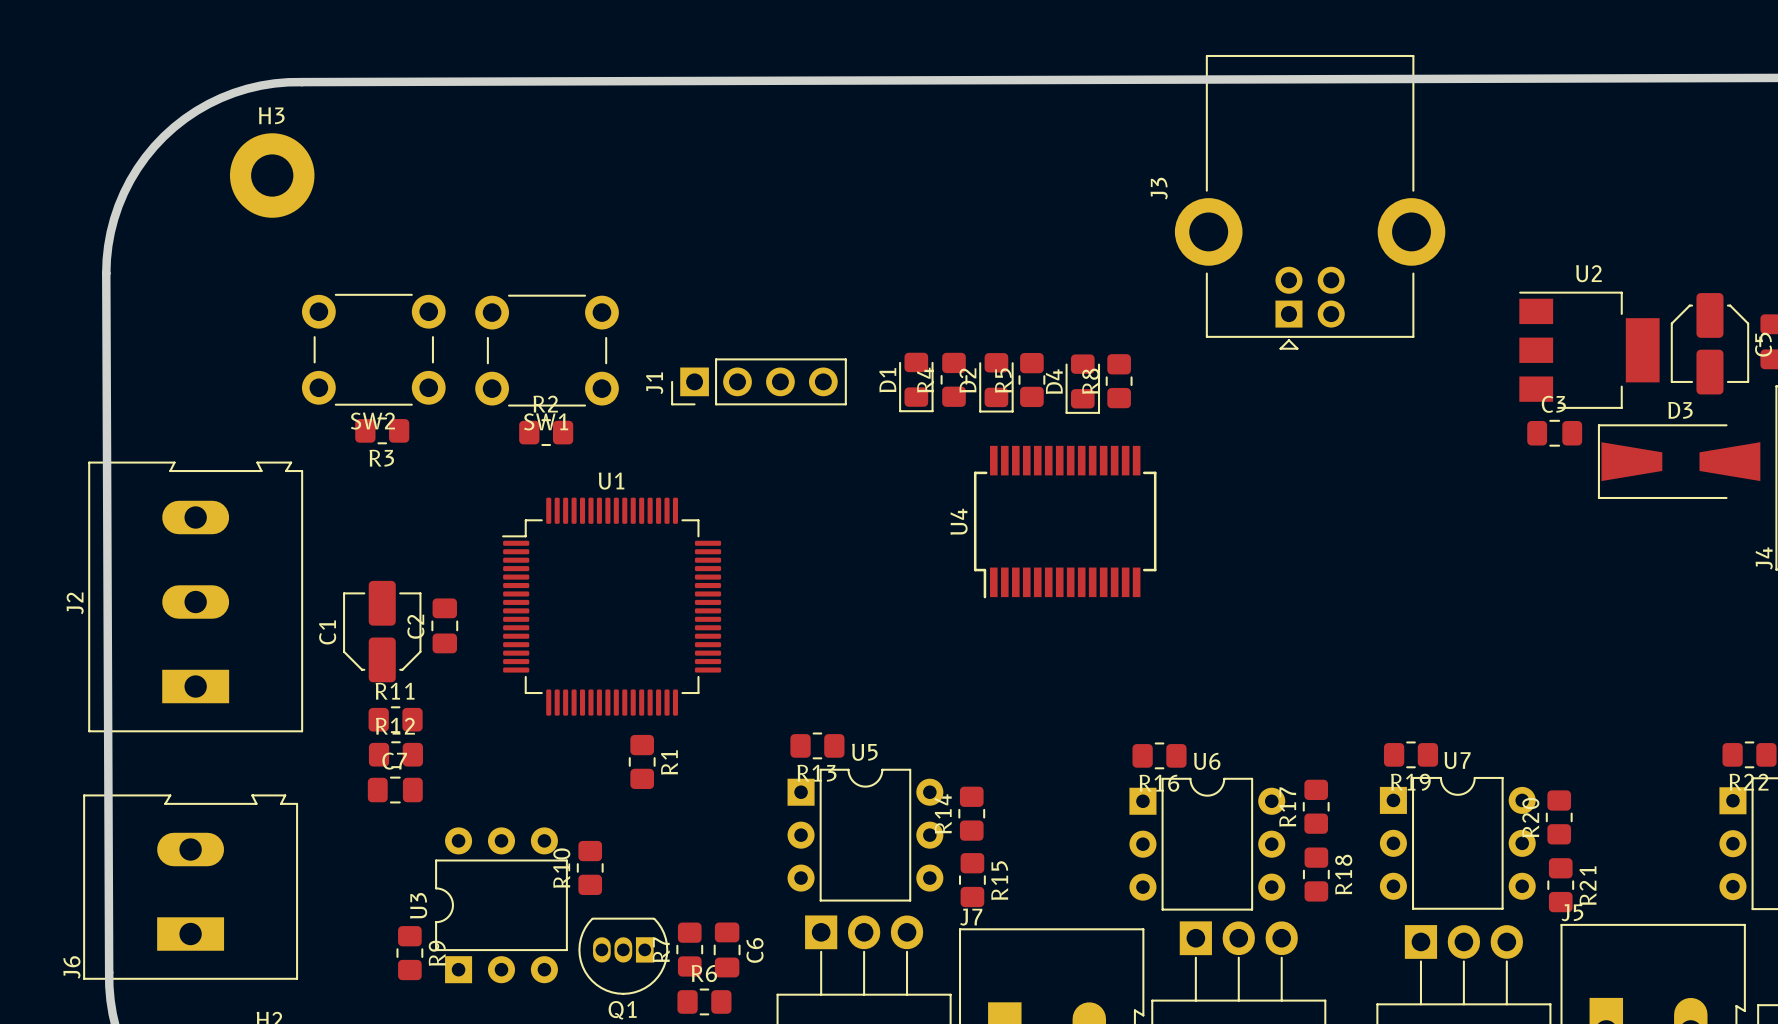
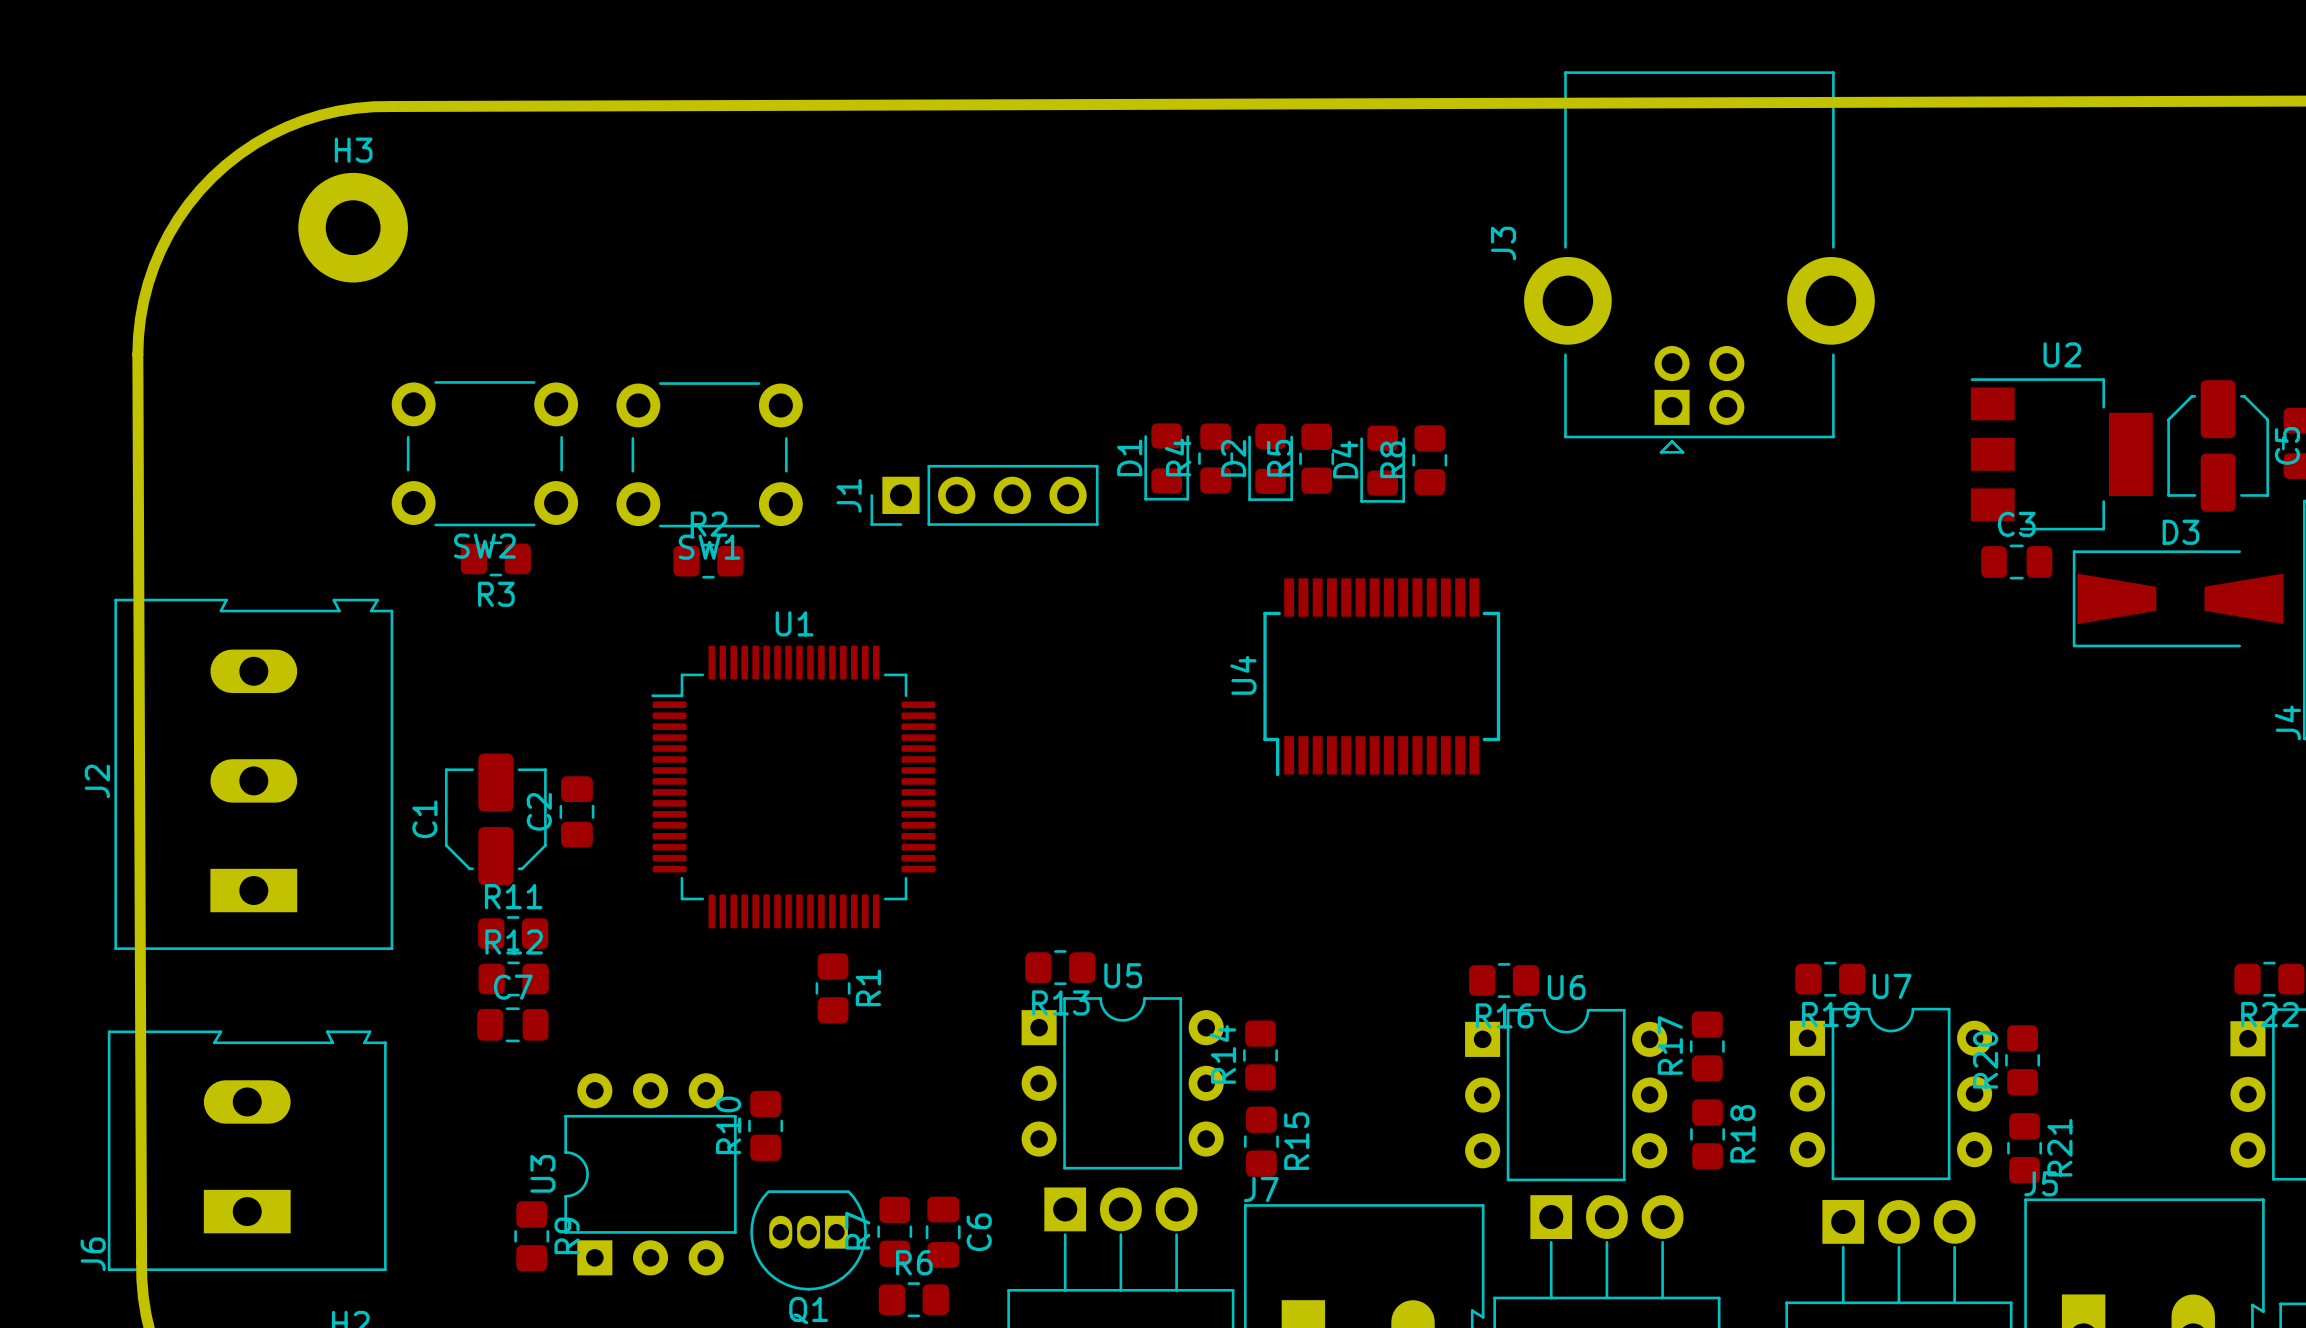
R4 position: (954, 379) -> (1215, 458)
R5 position: (1031, 380) -> (1316, 458)
R8 position: (1119, 381) -> (1429, 460)
D1 position: (916, 382) -> (1166, 461)
D2 position: (996, 382) -> (1270, 462)
D4 position: (1082, 384) -> (1382, 464)

